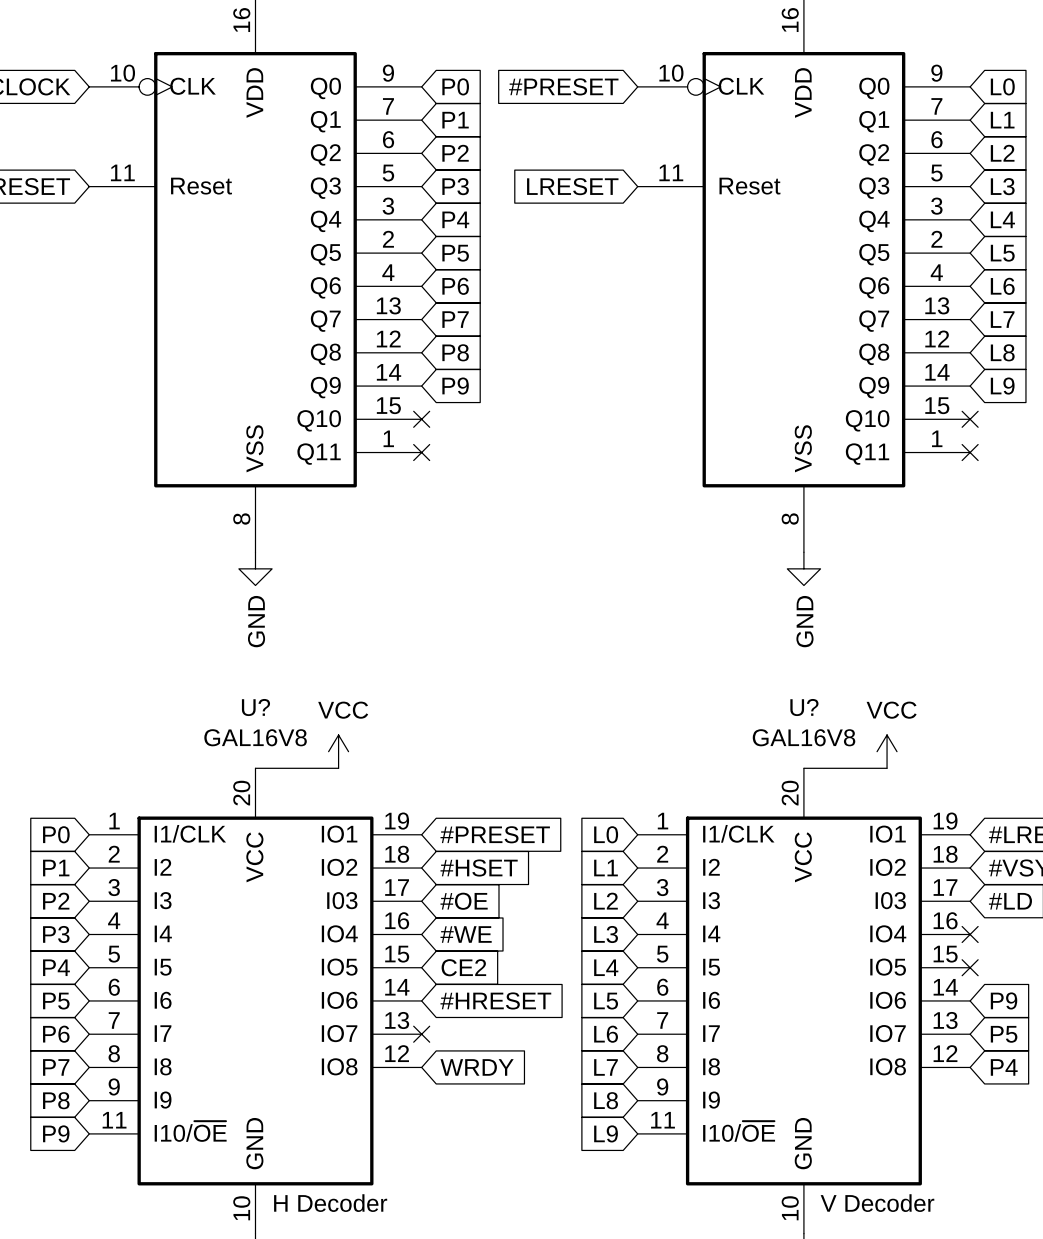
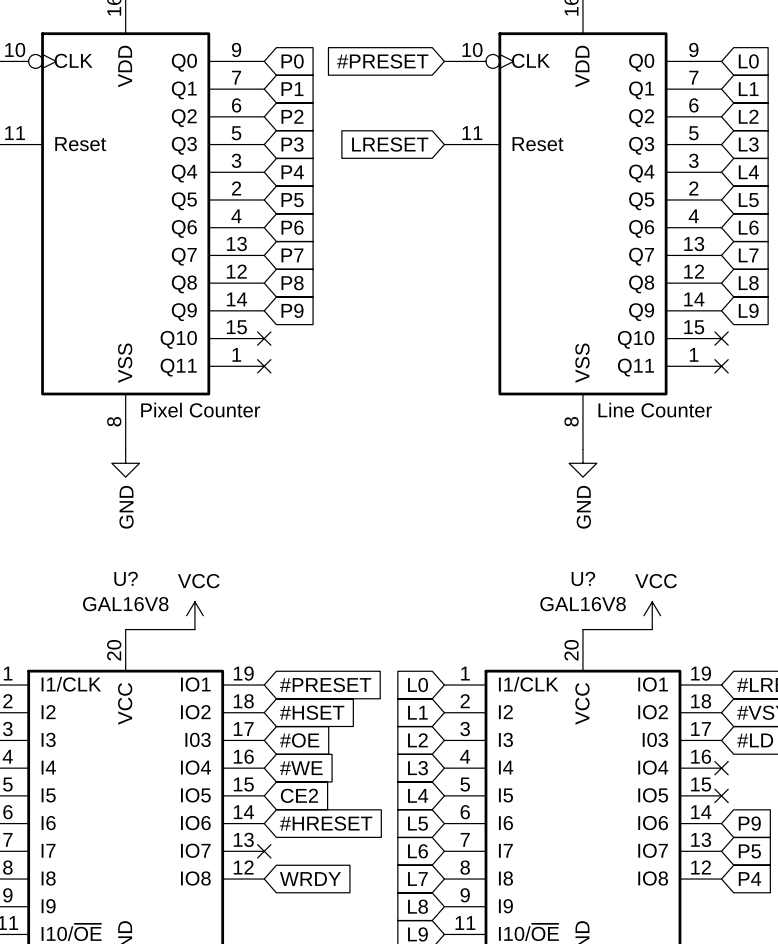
text: none -> Pixel Counter (200, 410)
text: none -> Line Counter (655, 410)

